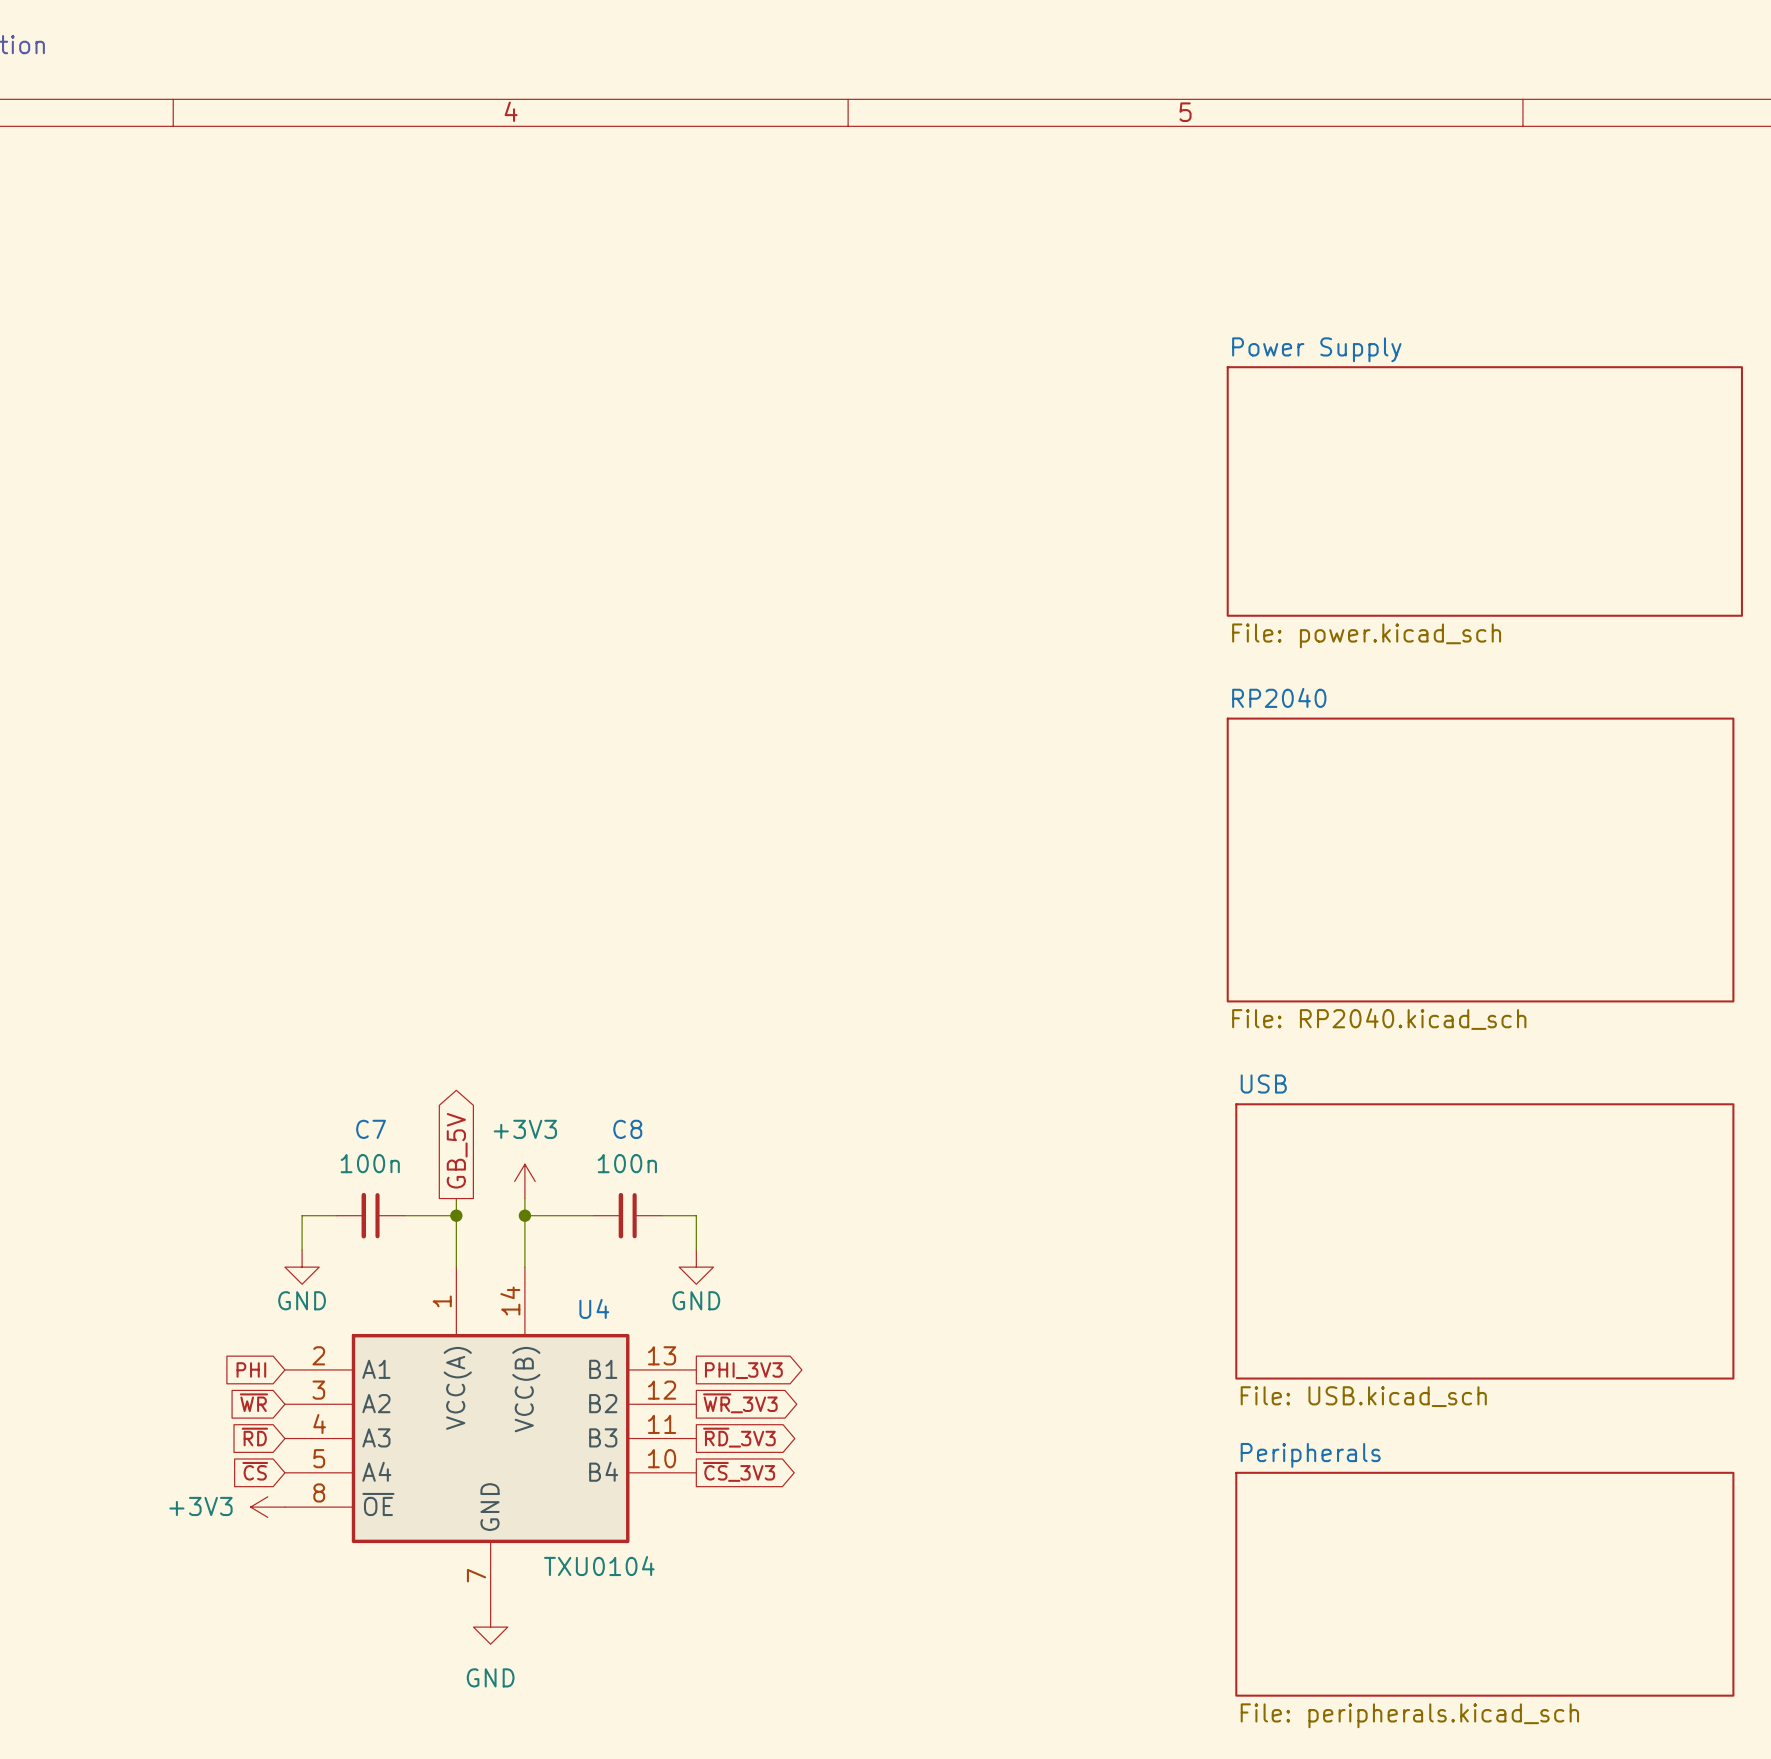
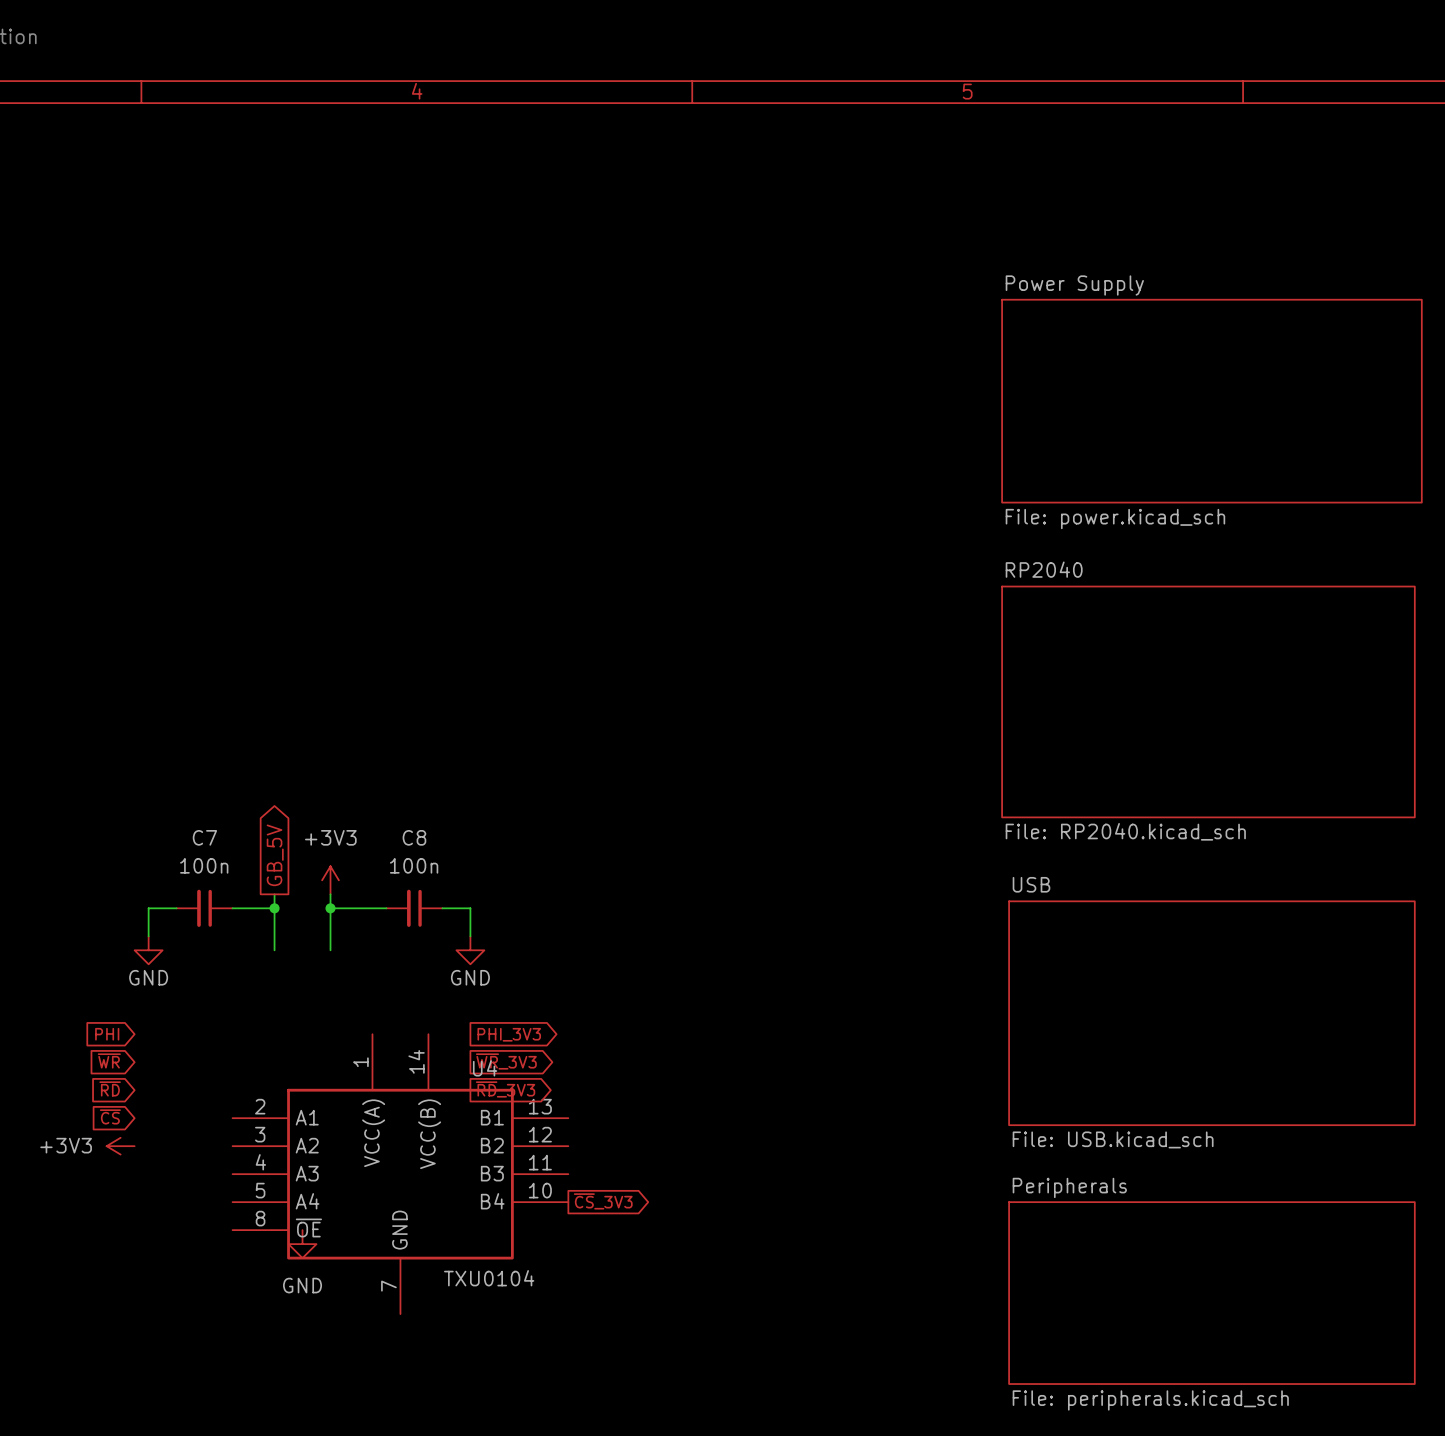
junction: none -> (274, 908)
junction: none -> (330, 908)
global label position: GB_5V (457, 1150) -> GB_5V (275, 855)
power symbol: none -> GND (148, 950)
power symbol: none -> GND (470, 950)
power symbol position: +3V3 (524, 1181) -> +3V3 (330, 880)
wire: (456, 1198) (456, 1267) -> (274, 894) (274, 950)
wire: (524, 1198) (524, 1267) -> (330, 894) (330, 950)
wire: (336, 1215) (302, 1215) (302, 1249) -> (176, 908) (148, 908) (148, 936)
C7 position: (370, 1215) -> (204, 908)
wire: (404, 1215) (456, 1215) -> (232, 908) (274, 908)
junction: (456, 1215) -> none
wire: (524, 1215) (593, 1215) -> (330, 908) (386, 908)
junction: (524, 1215) -> none
C8 position: (627, 1215) -> (414, 908)
wire: (662, 1215) (696, 1215) (696, 1249) -> (442, 908) (470, 908) (470, 936)
power symbol: GND (302, 1267) -> none
power symbol: GND (696, 1267) -> none
global label position: PHI (251, 1369) -> PHI (107, 1034)
global label position: PHI_3V3 (743, 1370) -> PHI_3V3 (509, 1034)
global label position: ~{WR} (253, 1402) -> ~{WR} (109, 1060)
global label position: ~{WR}_3V3 (740, 1403) -> ~{WR}_3V3 (506, 1061)
global label position: ~{RD} (254, 1436) -> ~{RD} (110, 1088)
global label position: ~{RD}_3V3 (739, 1437) -> ~{RD}_3V3 (505, 1089)
global label position: ~{CS} (255, 1471) -> ~{CS} (110, 1116)
power symbol position: +3V3 (267, 1507) -> +3V3 (120, 1146)
power symbol: none -> GND (302, 1244)
power symbol: GND (490, 1627) -> none

